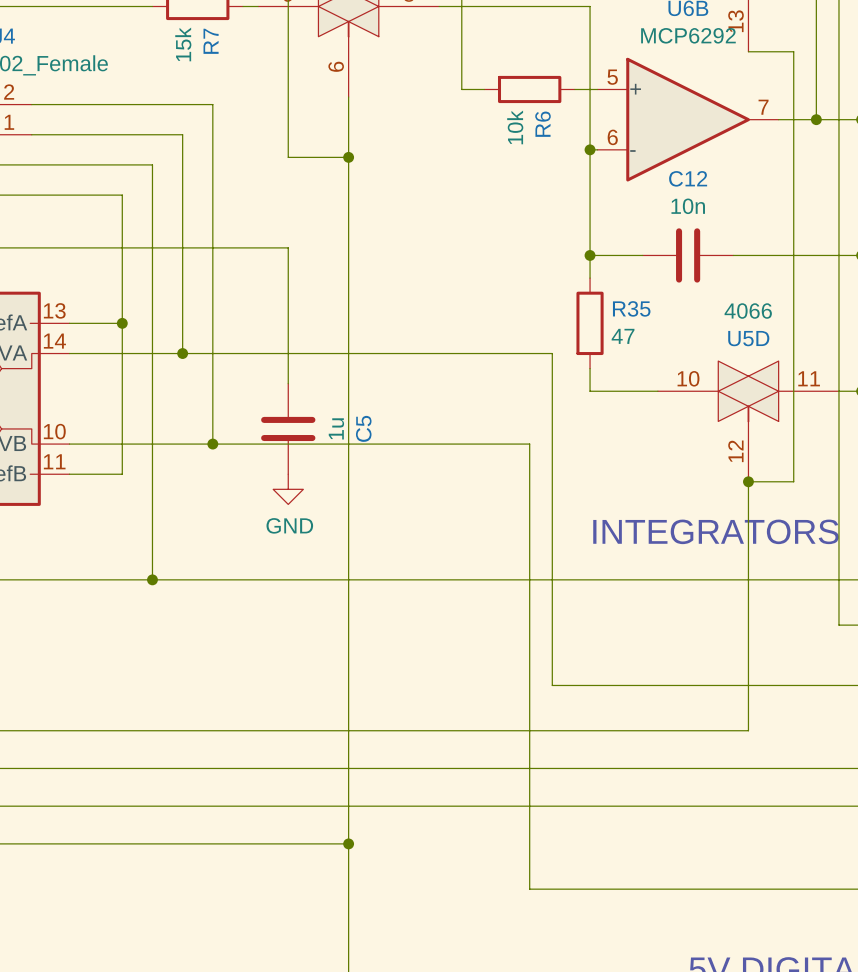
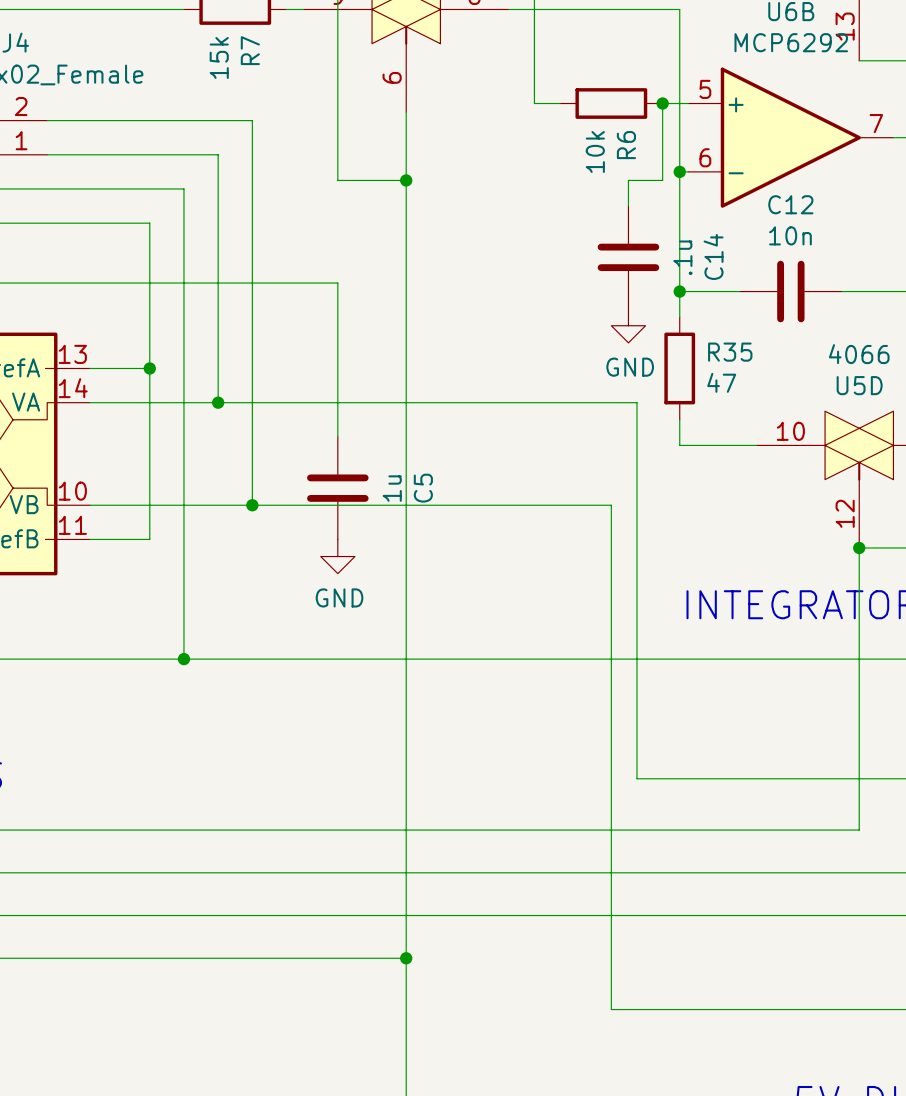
wire: none -> (662, 103) (662, 180) (628, 180) (628, 206)
junction: none -> (662, 103)
C14: none -> .1u (628, 257)
power symbol: none -> GND (628, 325)

